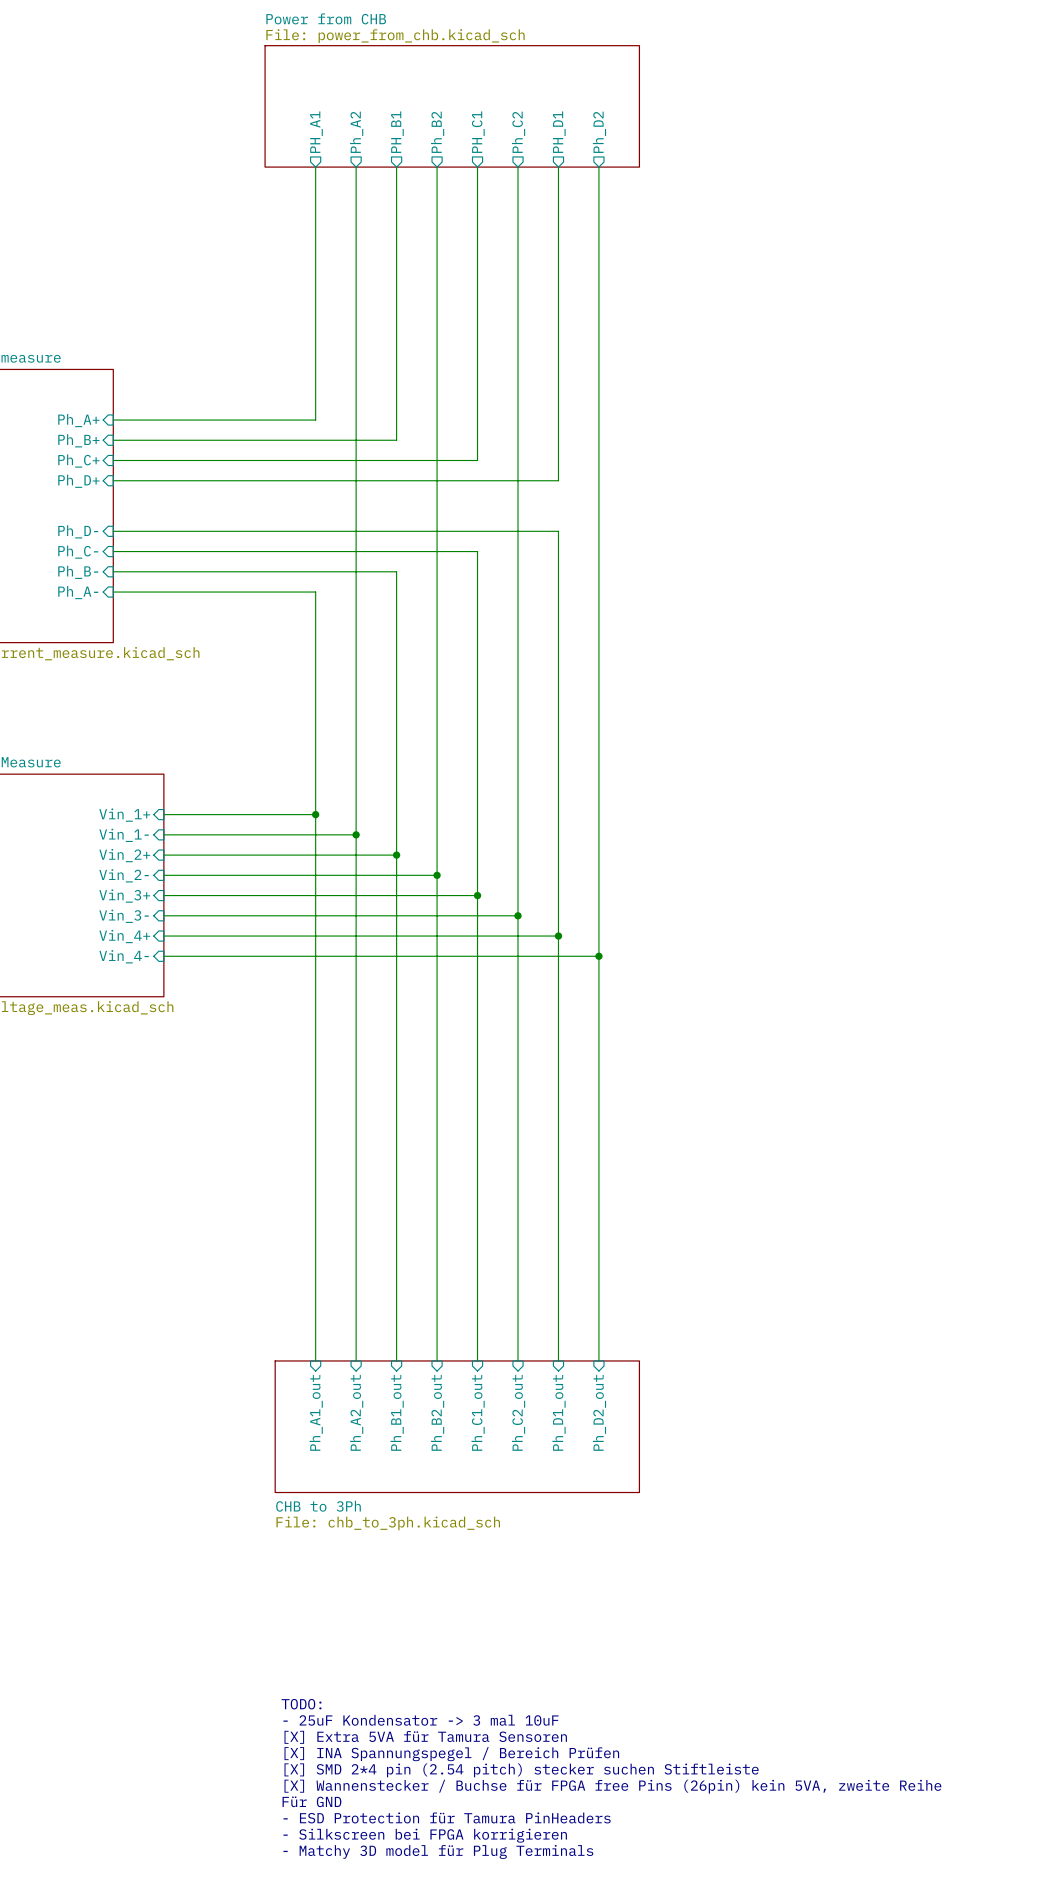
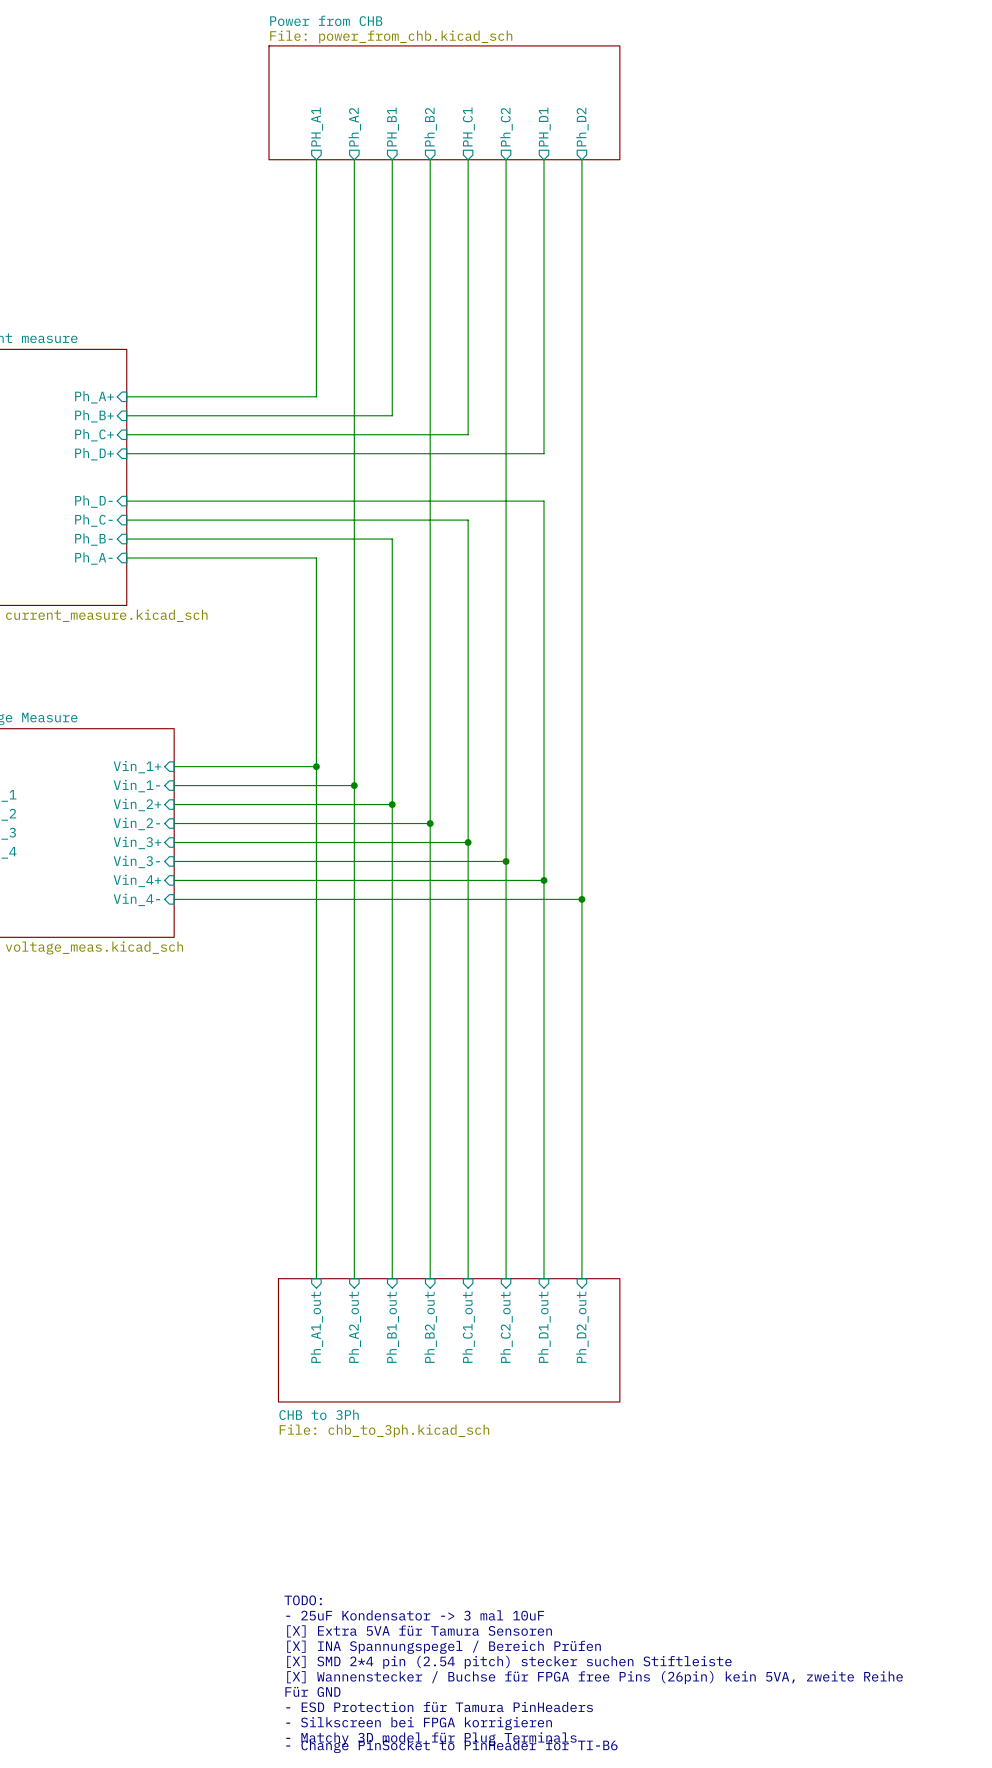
text: none -> - Change PinSocket to PinHeader for TI-B6 (451, 1746)

